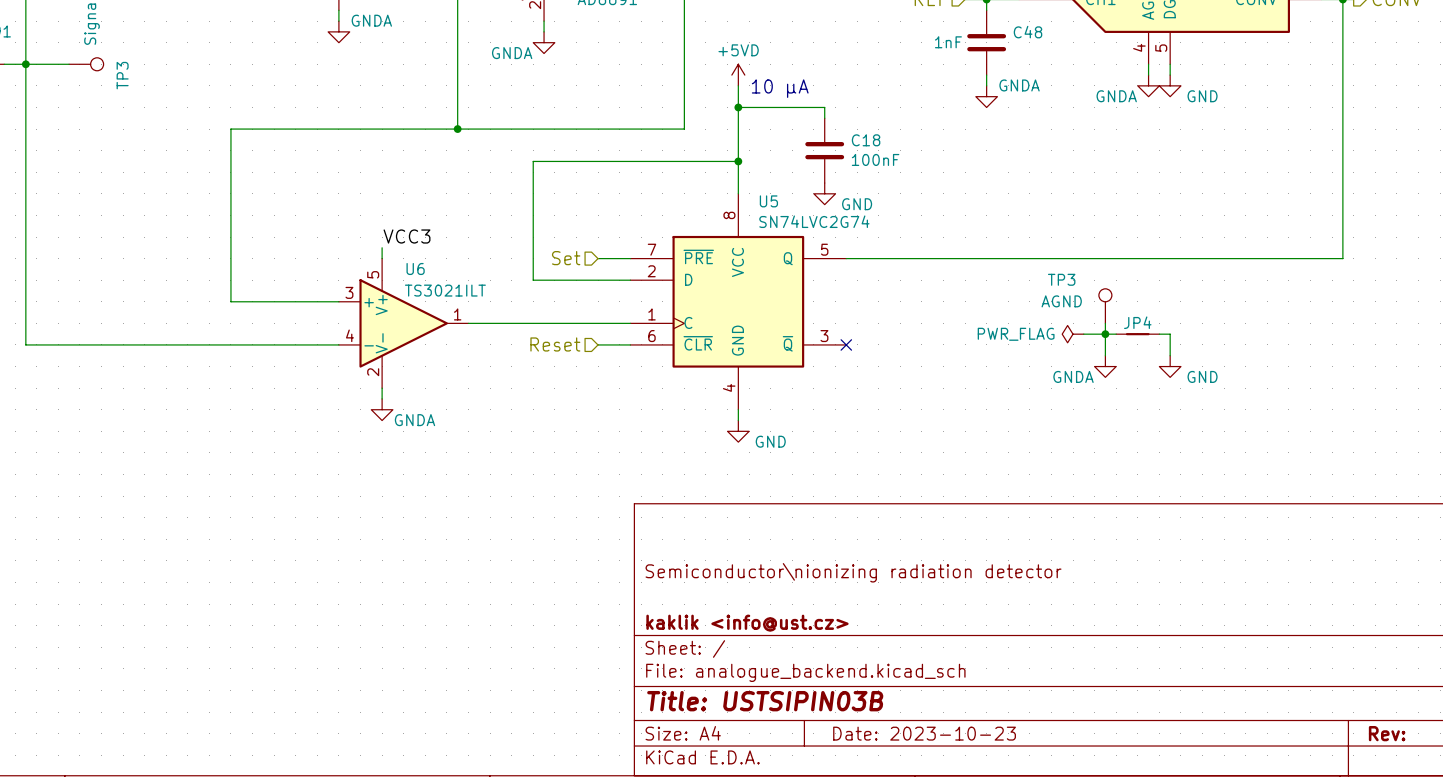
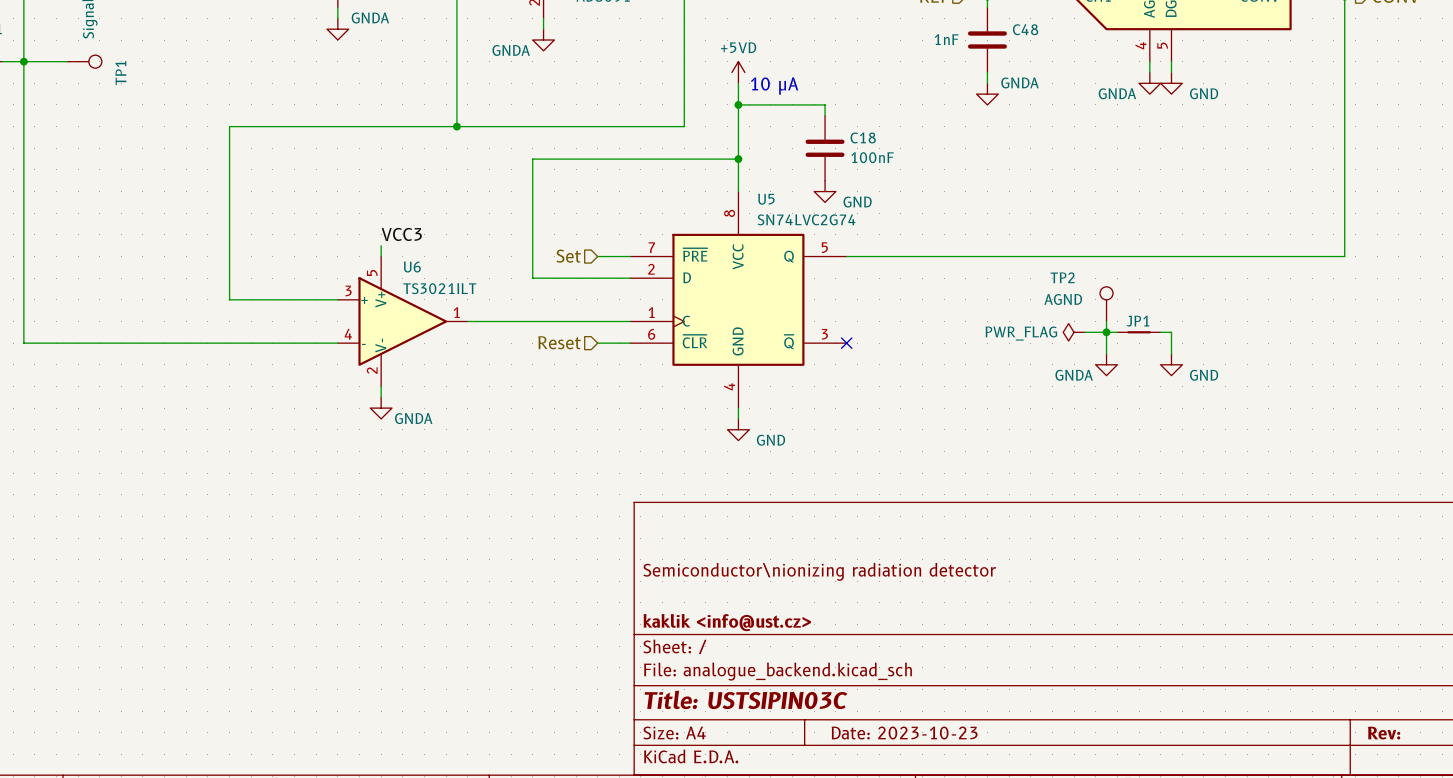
TP3 name: TP3 (122, 75) -> TP1 (120, 73)
TP3 name: TP3 (1061, 279) -> TP2 (1062, 277)
JP4 name: JP4 (1137, 322) -> JP1 (1138, 321)
title block: Title: USTSIPIN03B (765, 701) -> Title: USTSIPIN03C (745, 699)

